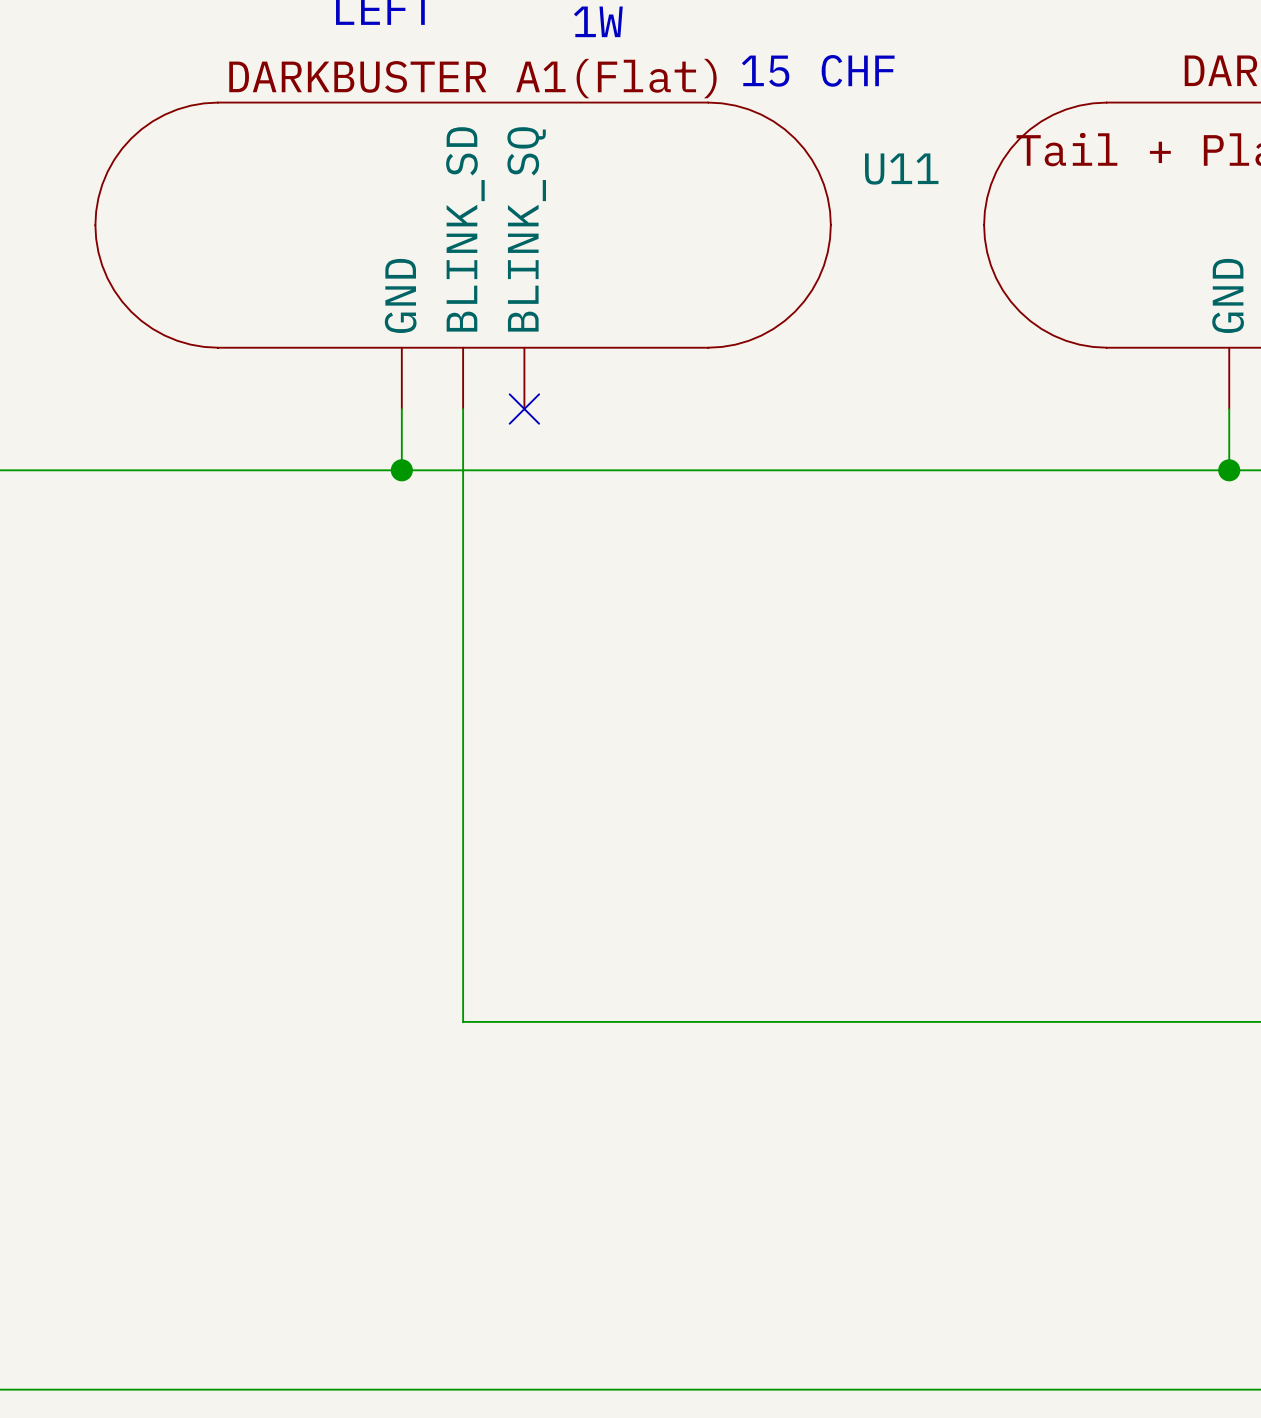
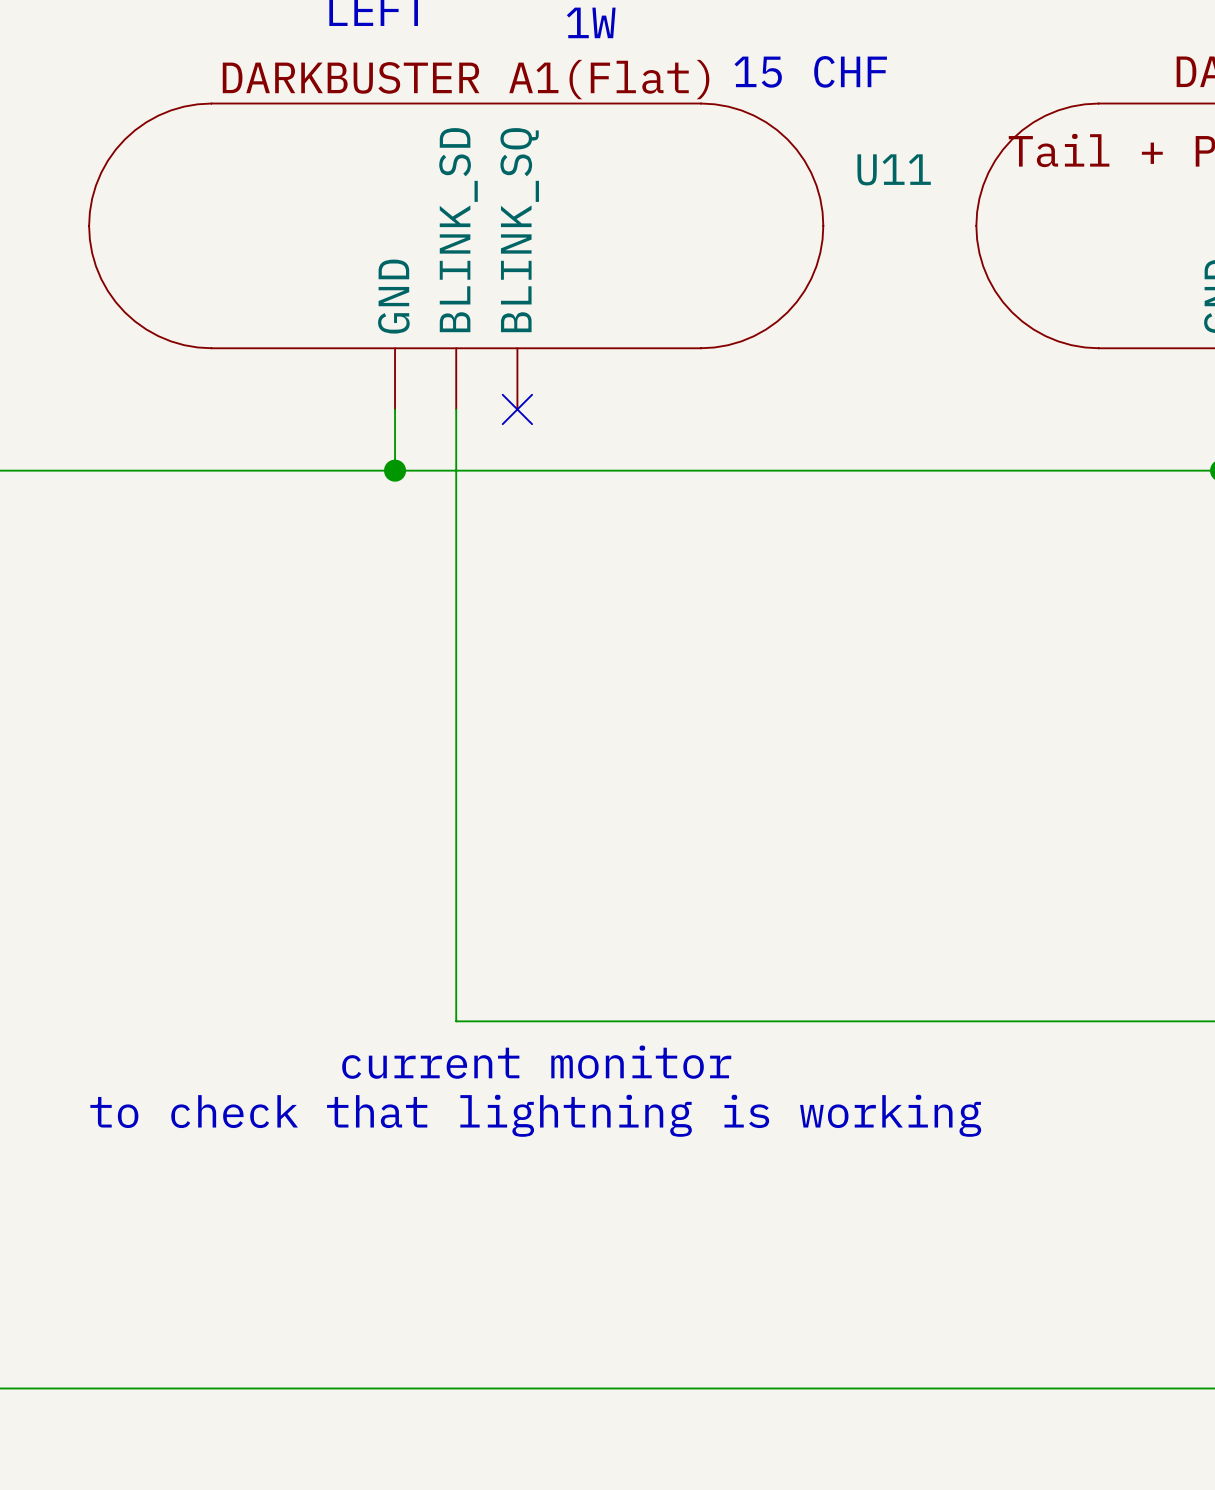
text: none -> current monitor (536, 1062)
text: none -> to check that lightning is working (535, 1115)

